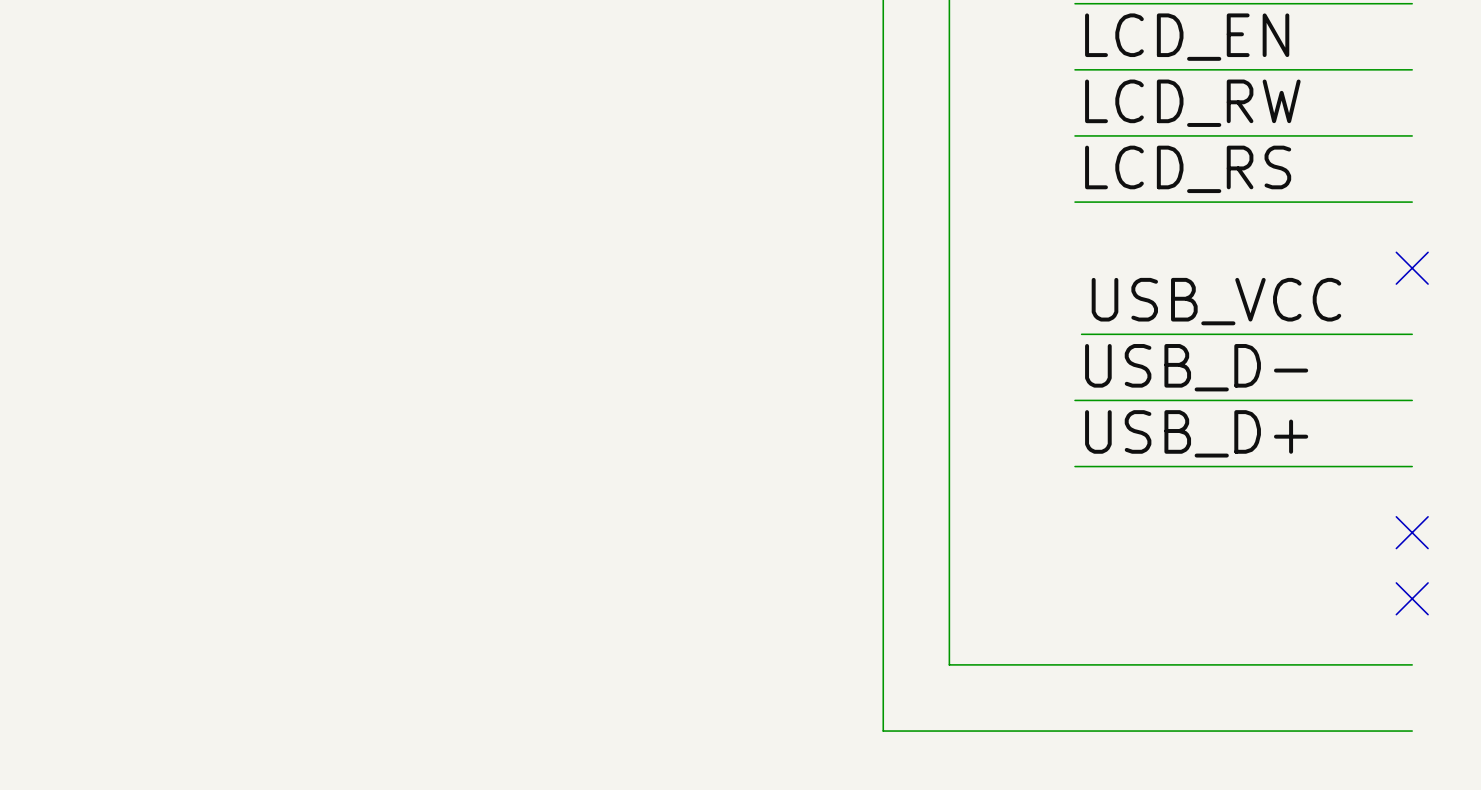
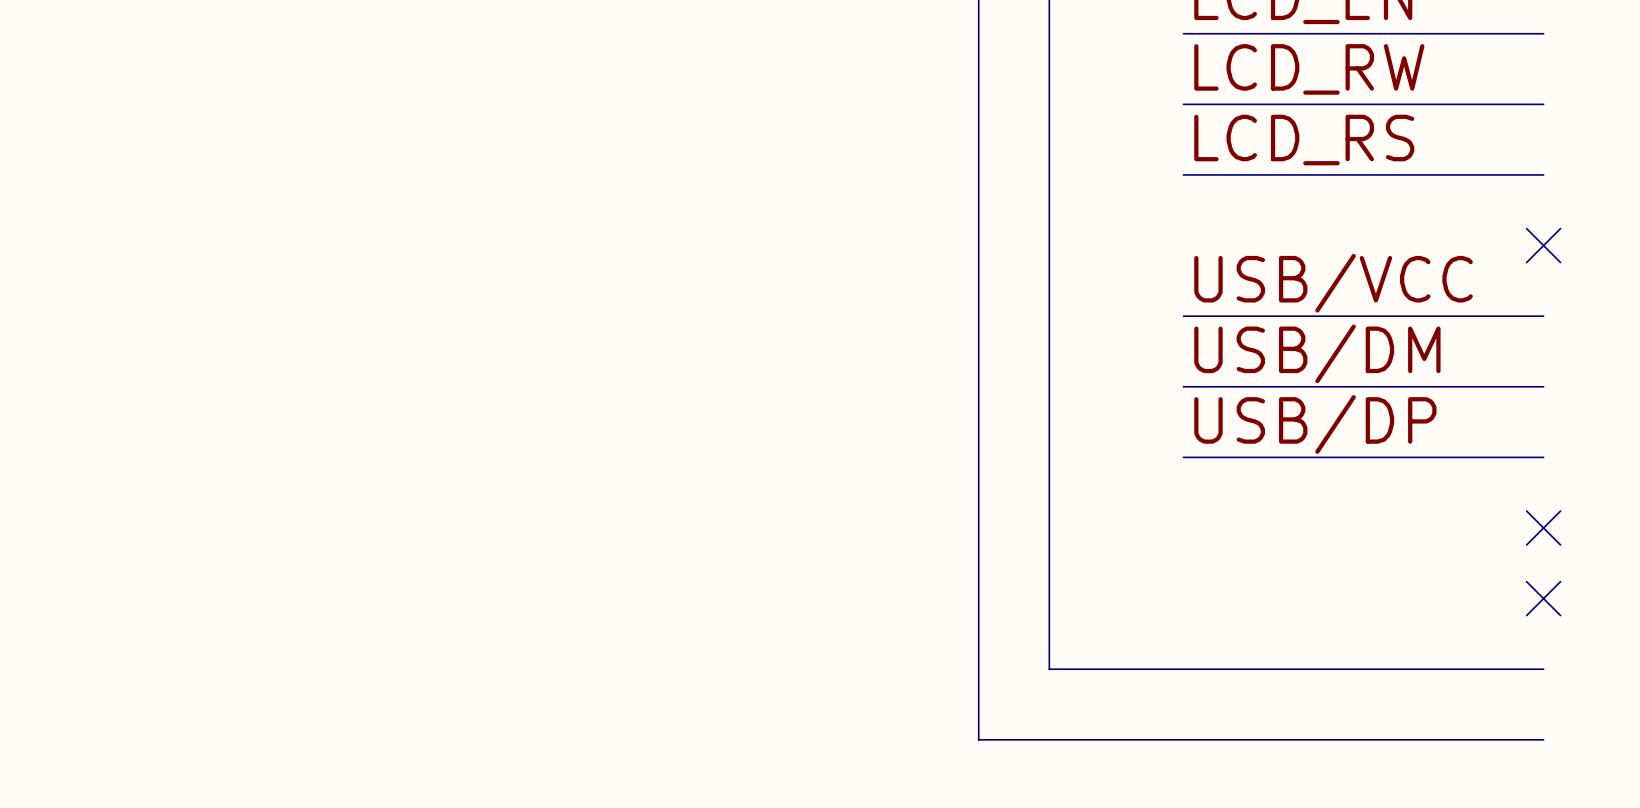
label: USB_VCC (1216, 301) -> USB/VCC (1333, 283)
wire: none -> (1183, 316) (1190, 316)
label: USB_D- (1196, 367) -> USB/DM (1317, 353)
label: USB_D+ (1196, 433) -> USB/DP (1315, 424)

